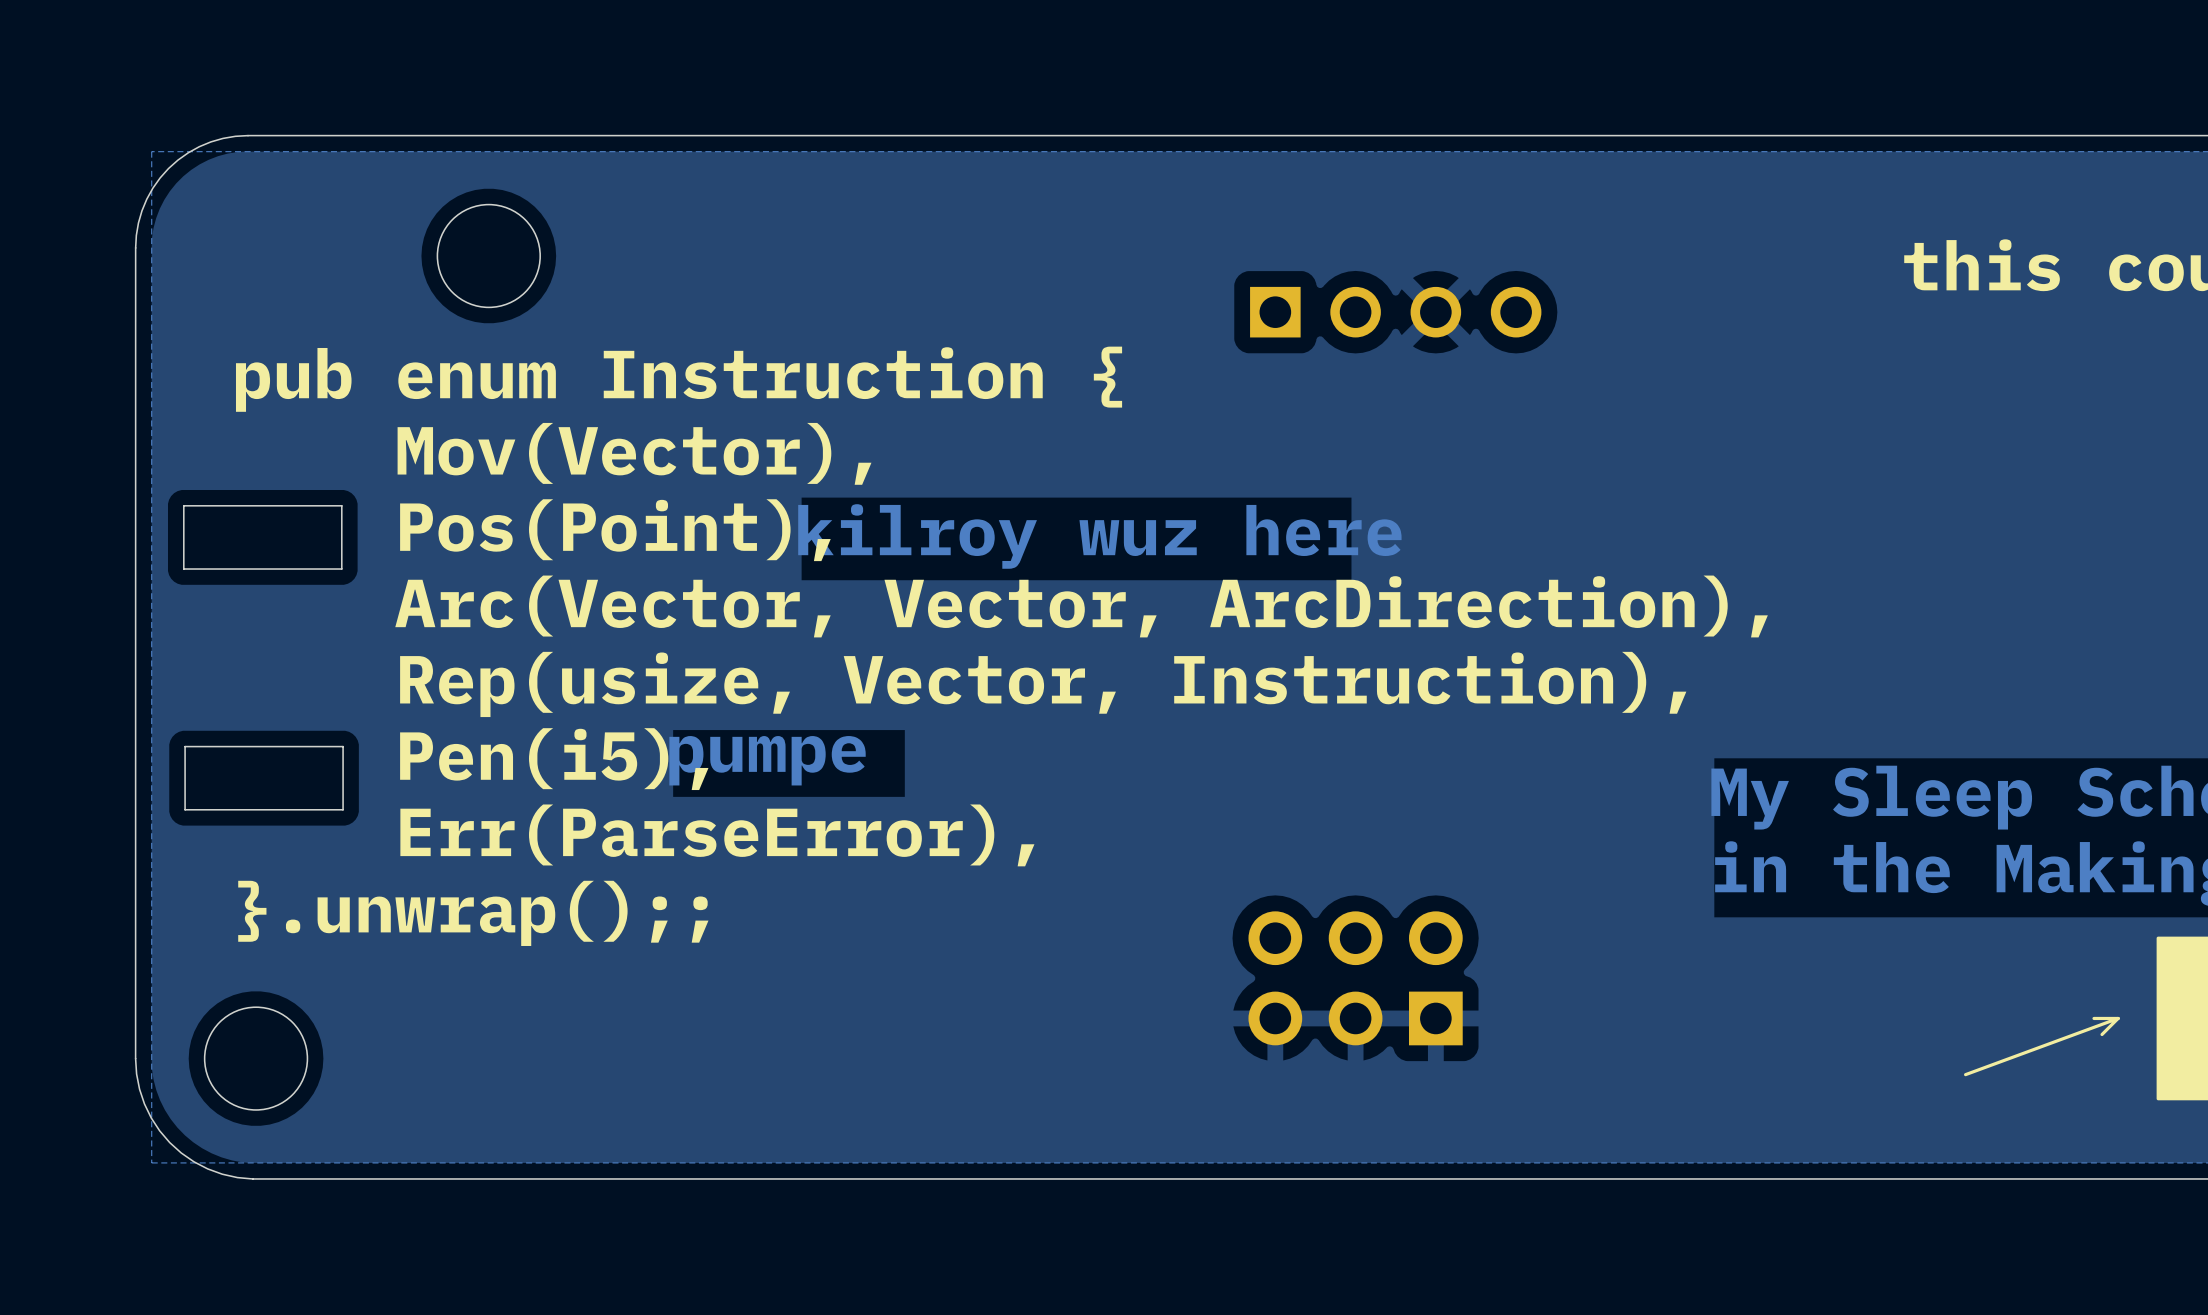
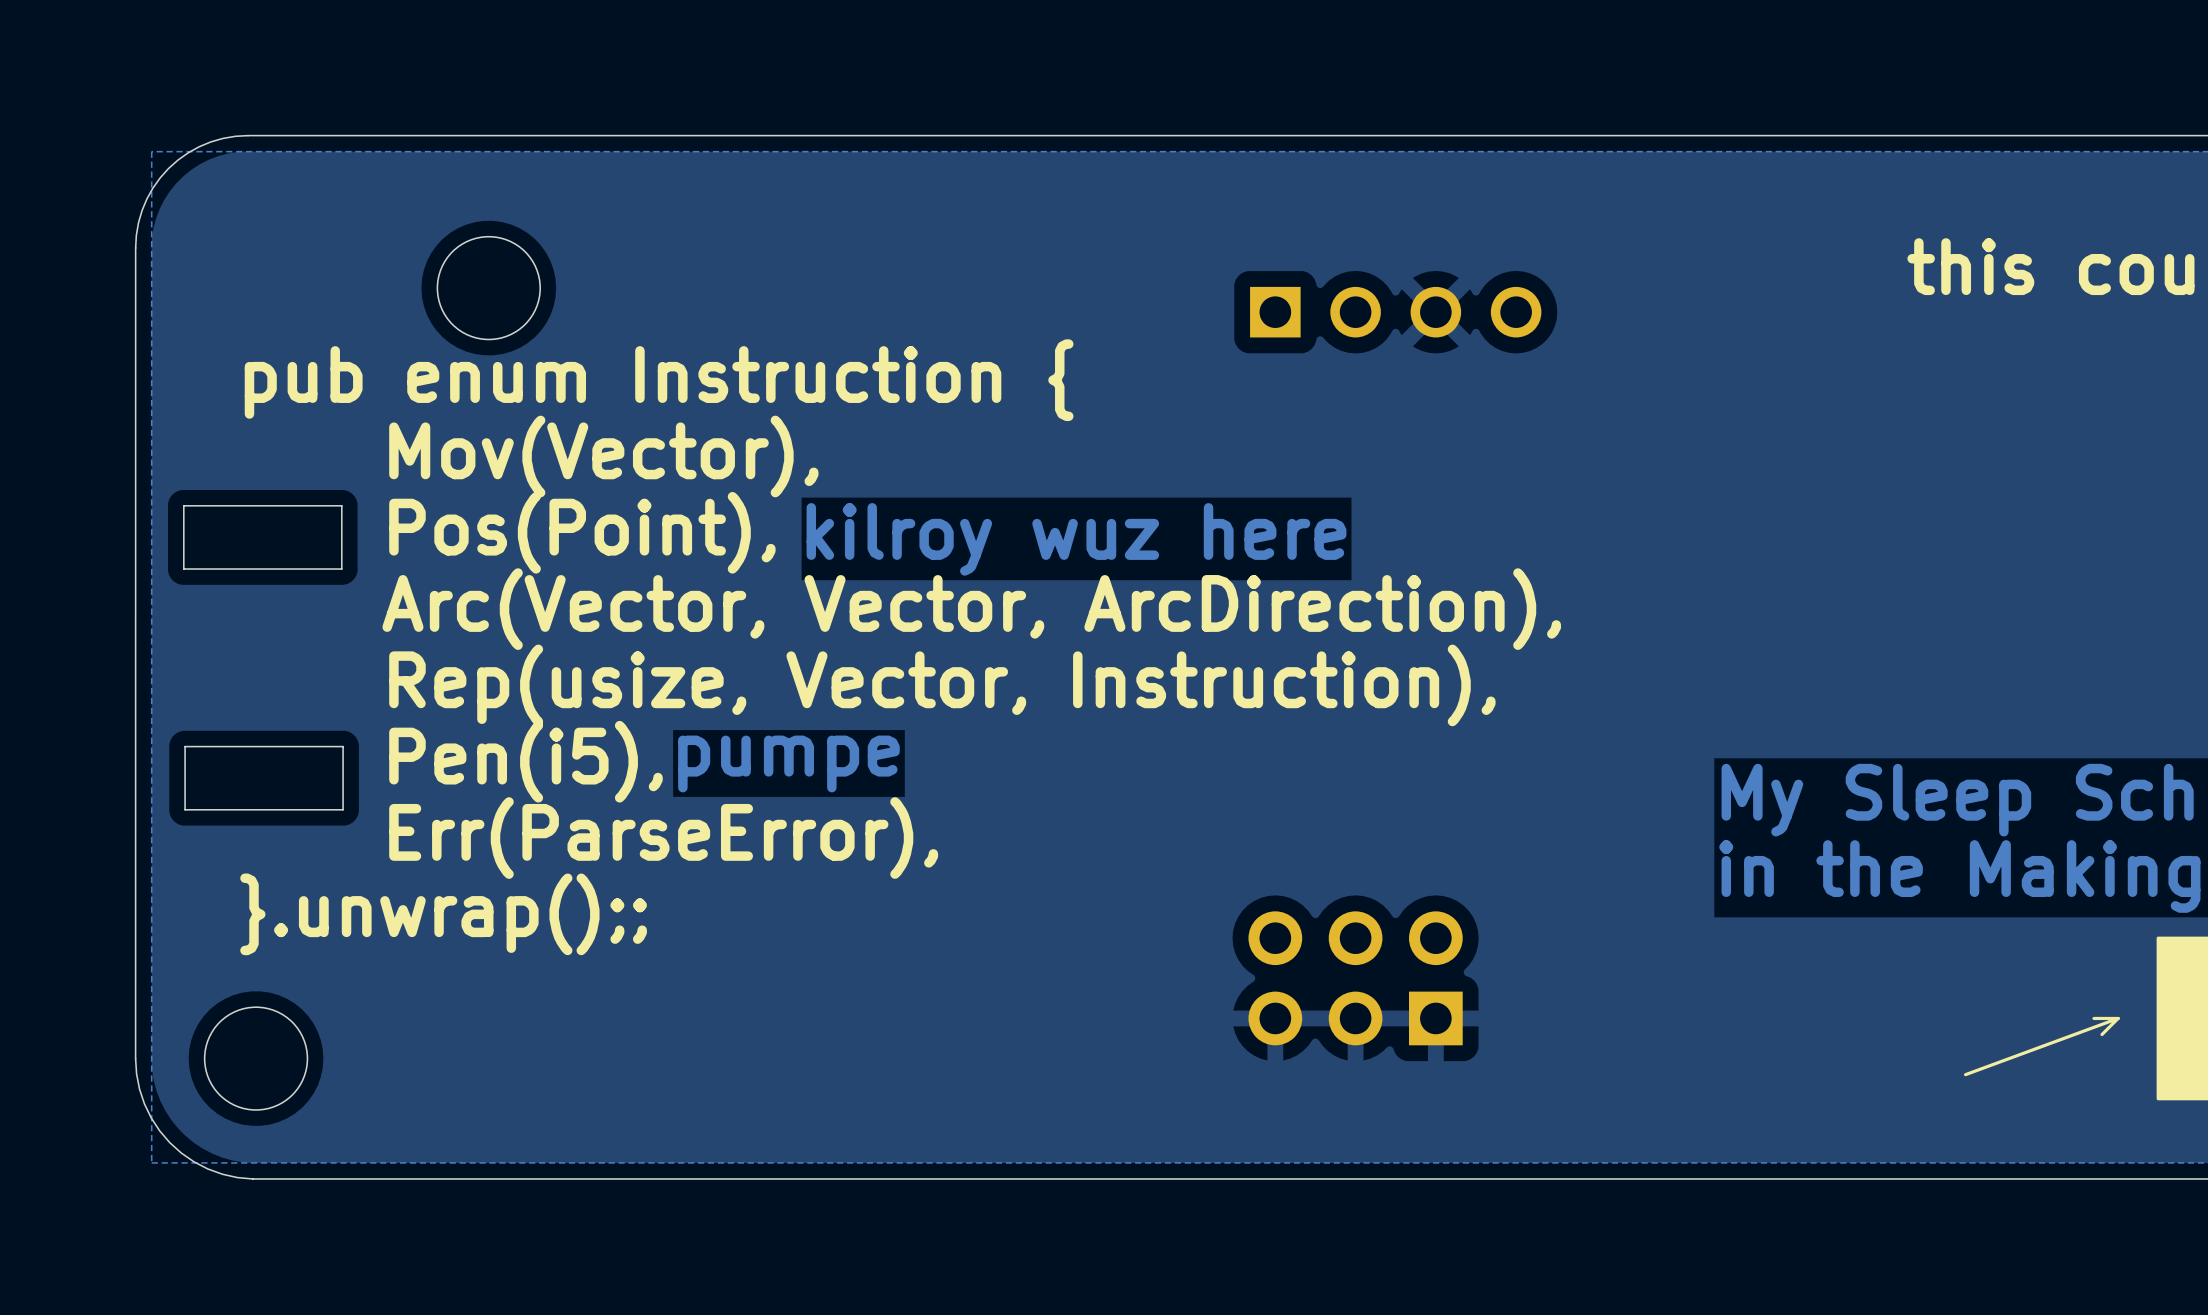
round board edge position: (488, 255) -> (488, 288)

